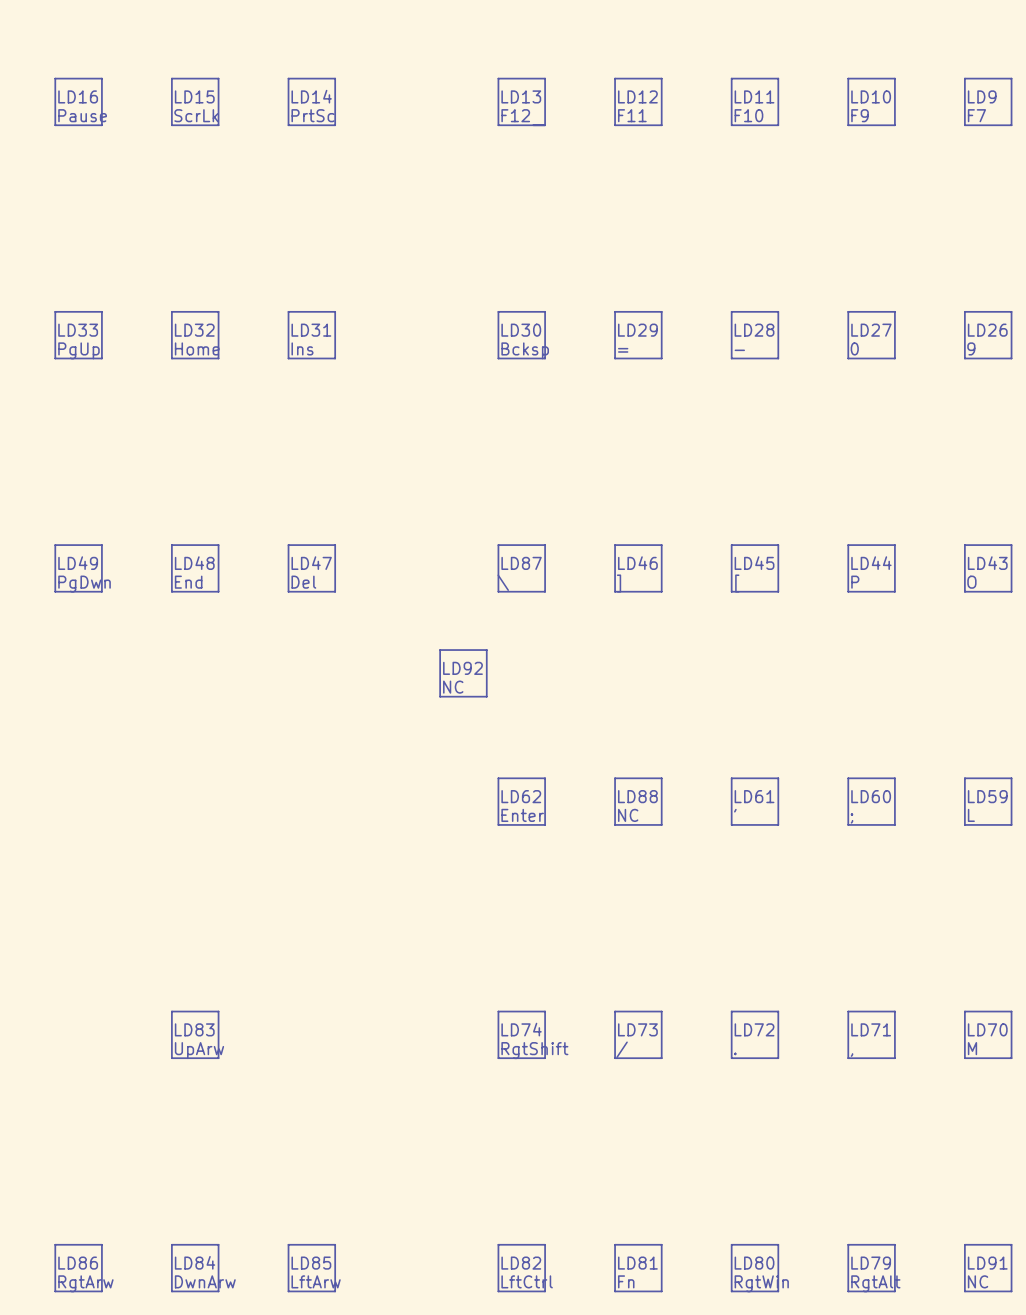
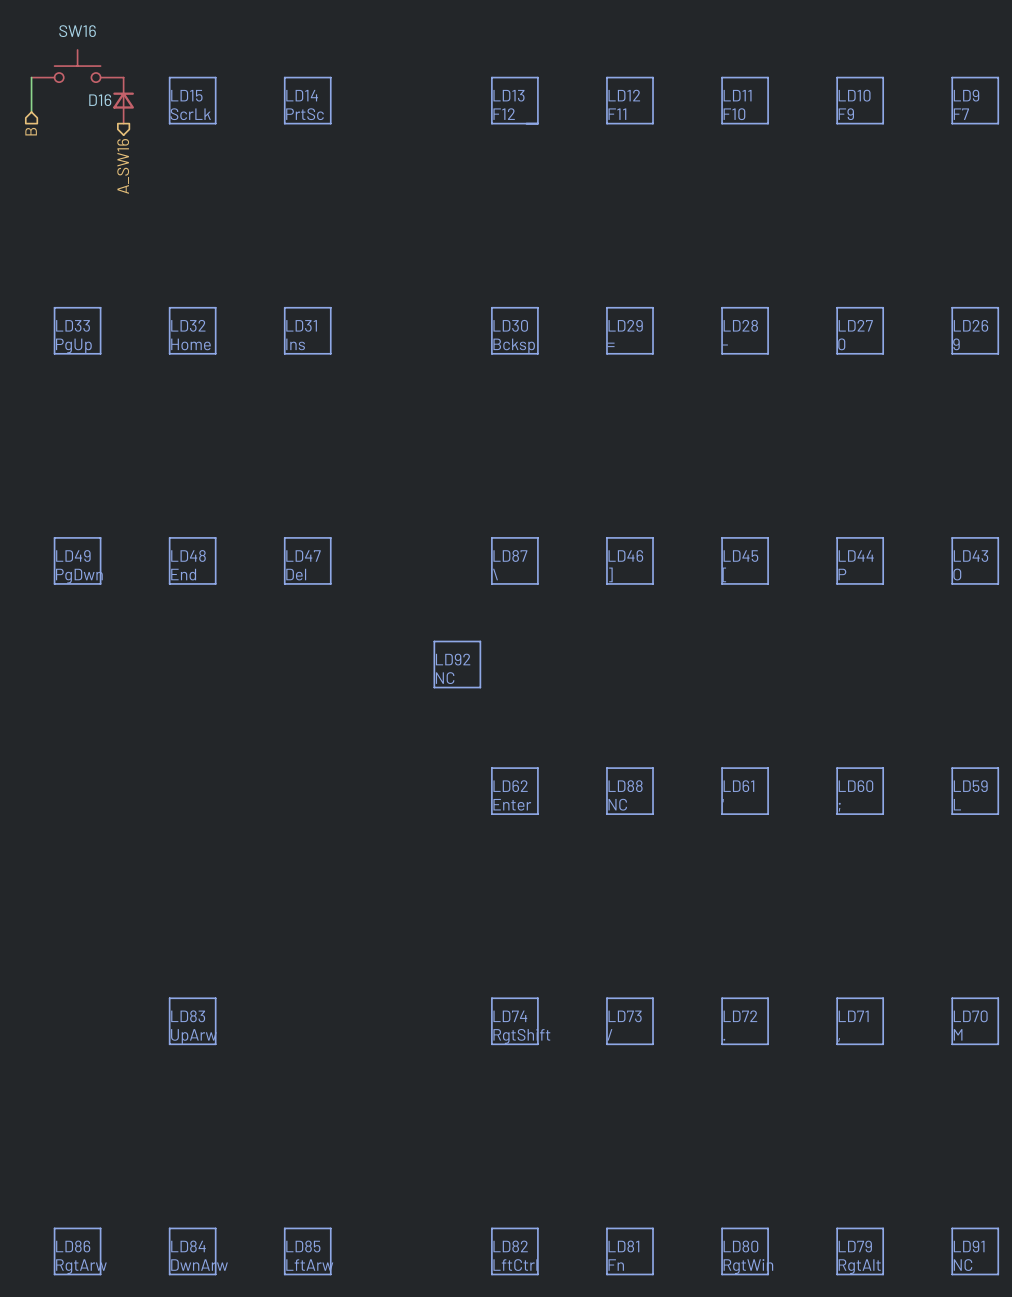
SW16: none -> (77, 66)
wire: none -> (31, 77) (31, 112)
line: (55, 78) (101, 78) (101, 125) (55, 125) (55, 78) -> none
text: LD16 (78, 96) -> none
D16: none -> (123, 100)
text: Pause (82, 115) -> none
hierarchical label: none -> B (31, 131)
hierarchical label: none -> A_SW16 (123, 166)

